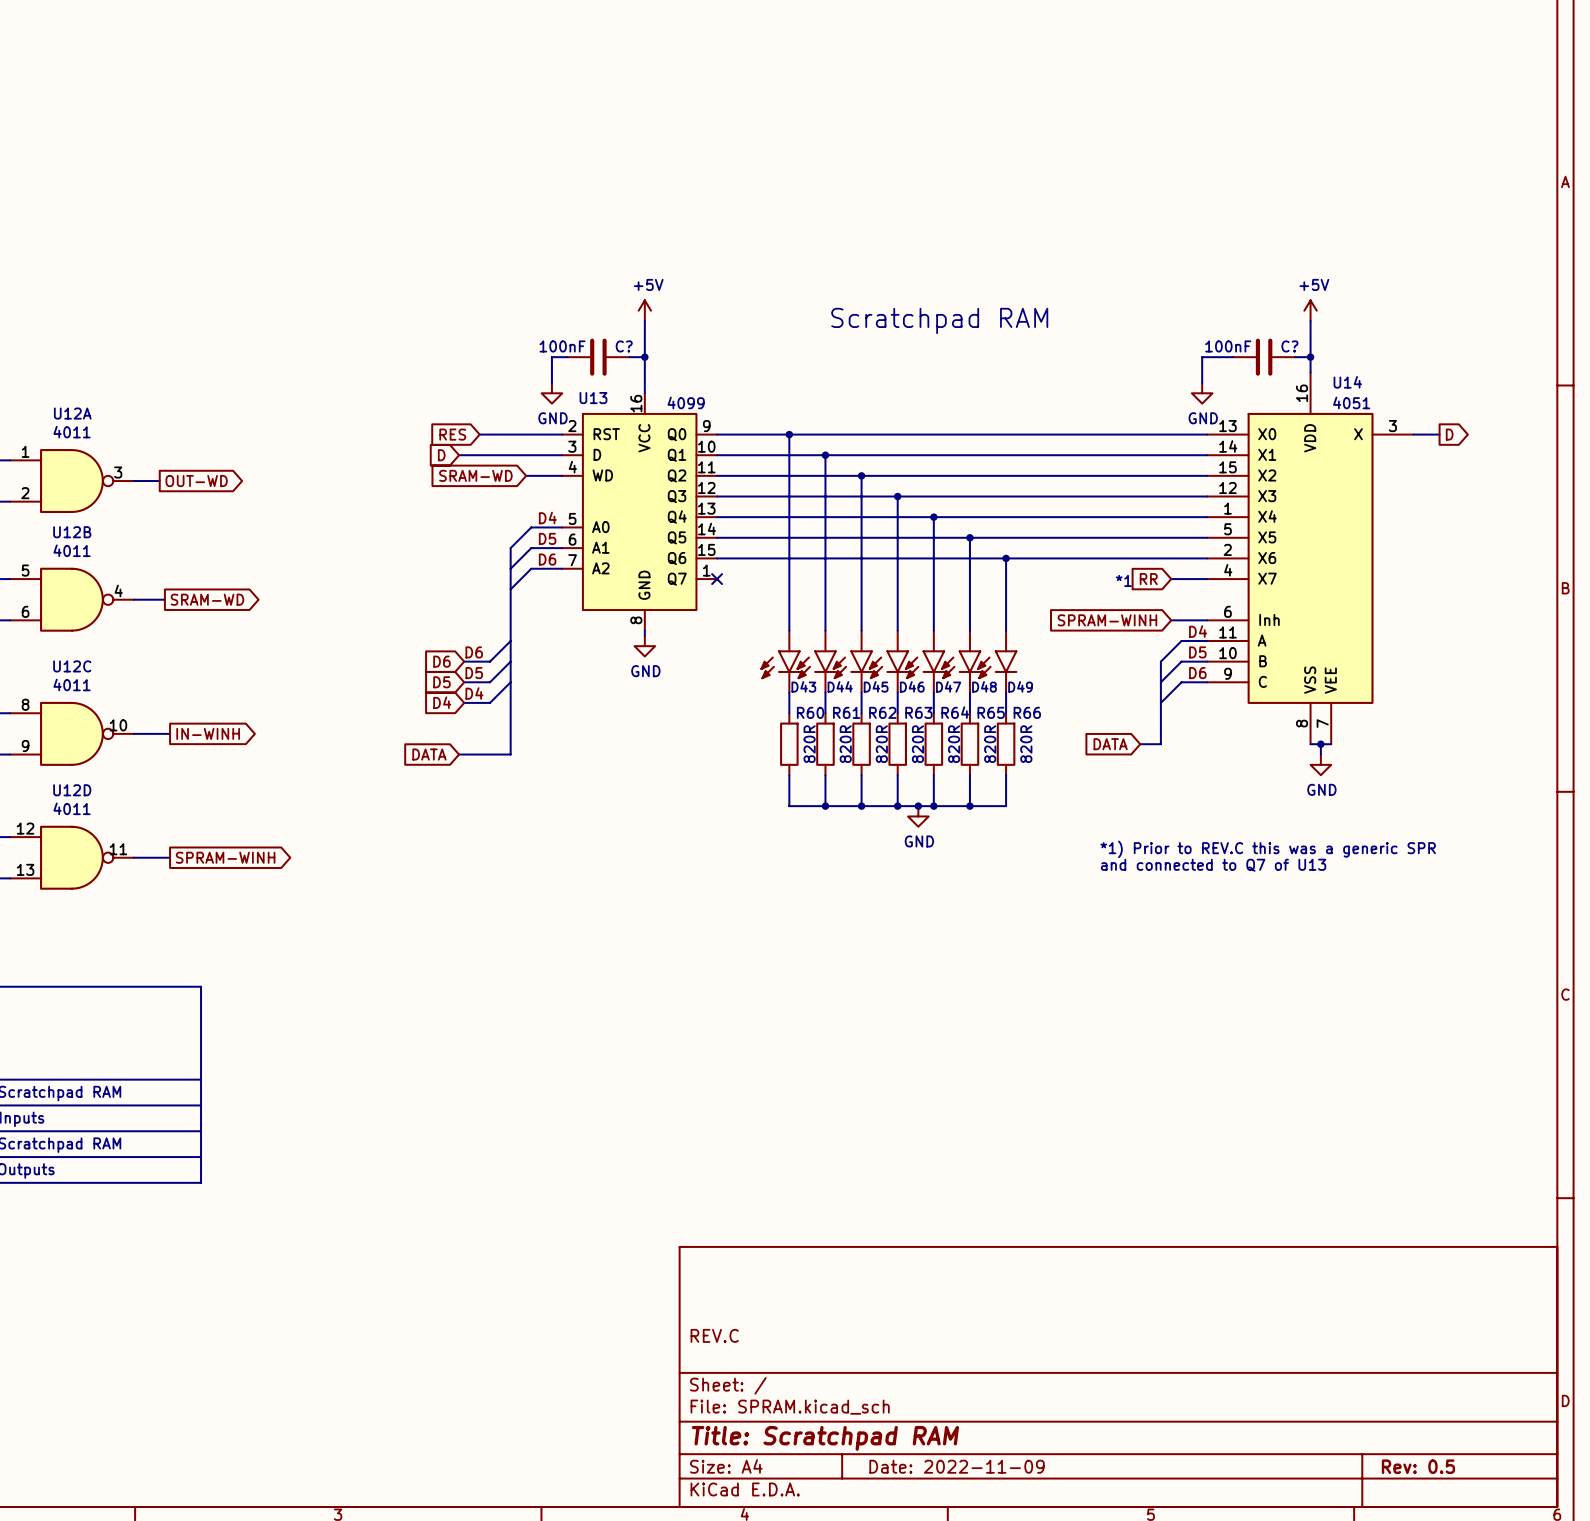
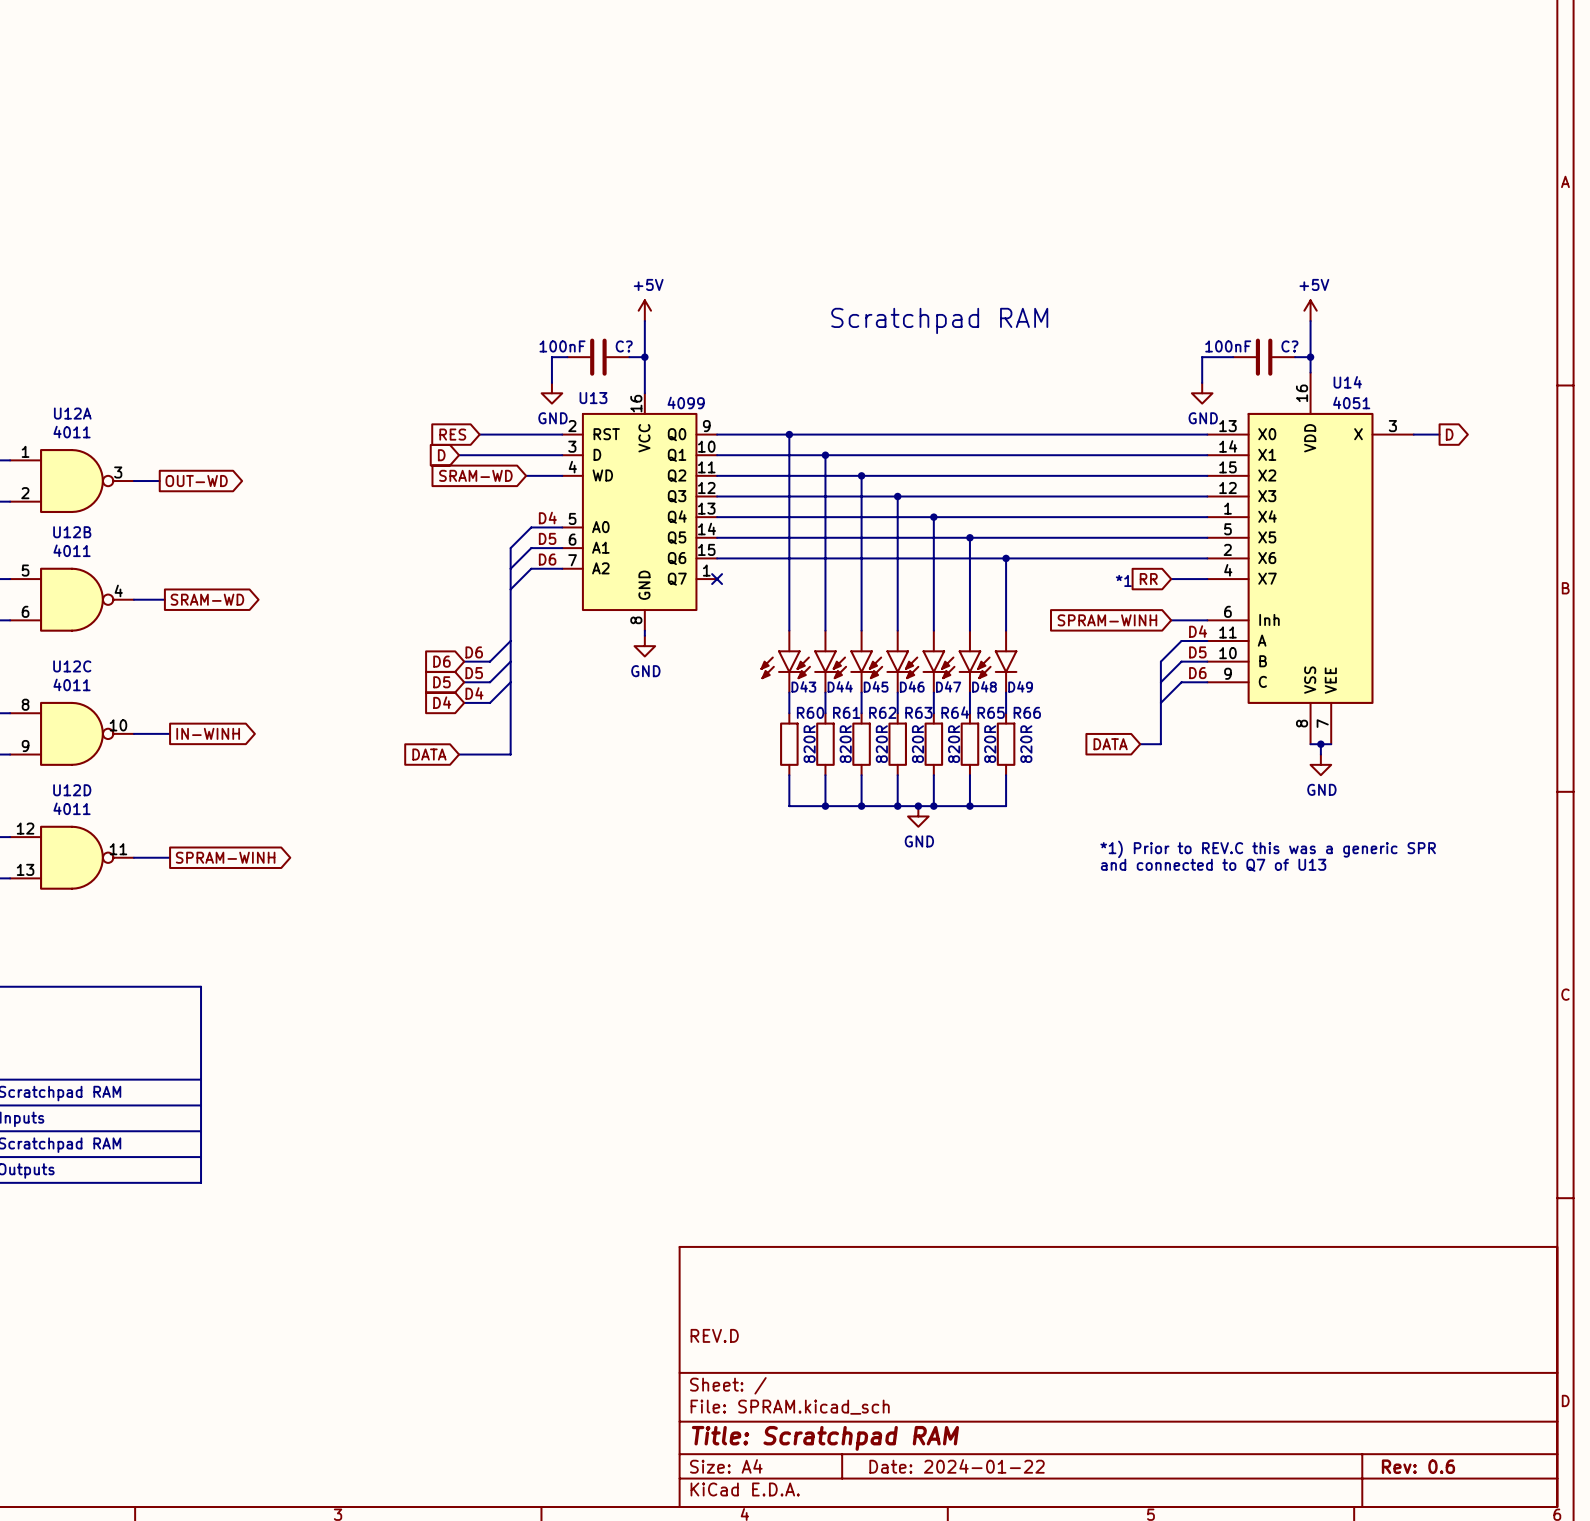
title block: REV.C (714, 1335) -> REV.D (714, 1335)
title block: Date: 2022-11-09 (957, 1466) -> Date: 2024-01-22 (957, 1466)
title block: Rev: 0.5 (1418, 1466) -> Rev: 0.6 (1418, 1466)

